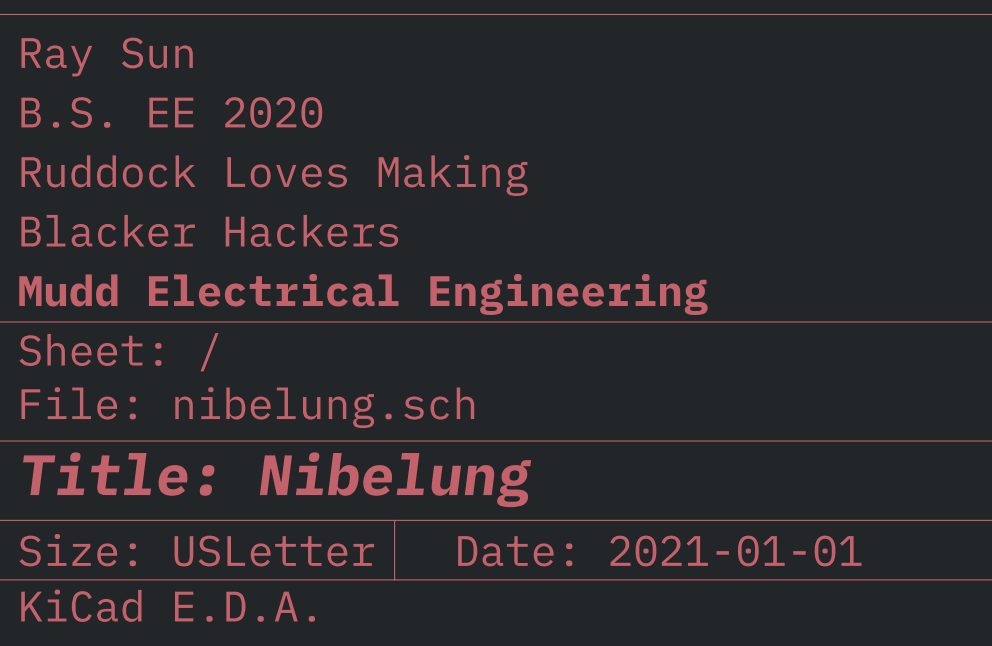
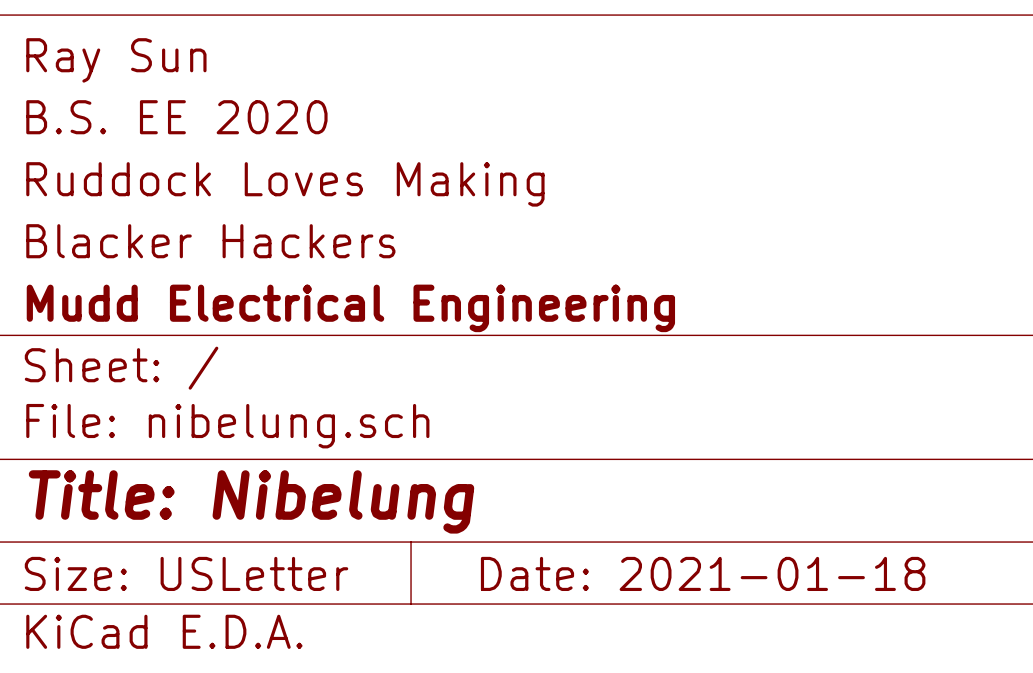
title block: Date: 2021-01-01 (659, 551) -> Date: 2021-01-18 (703, 573)

